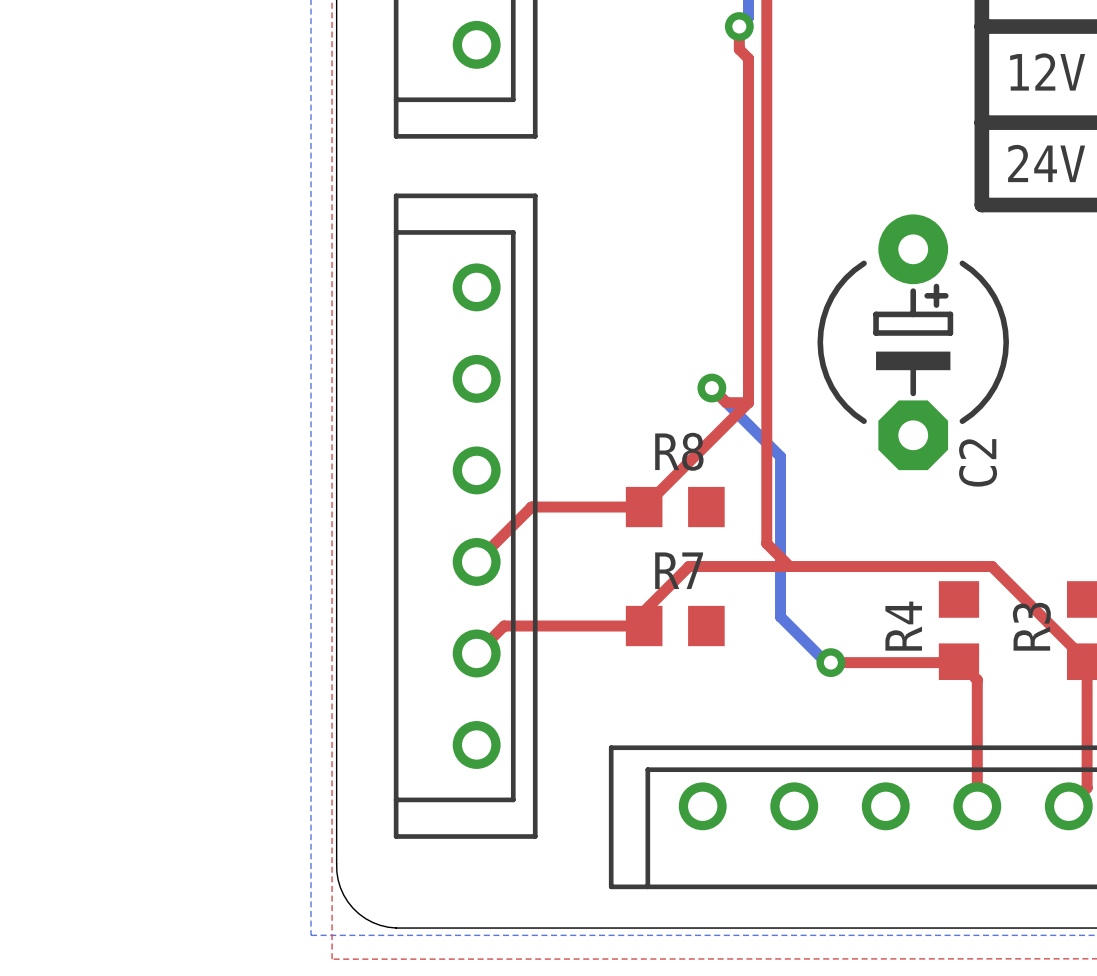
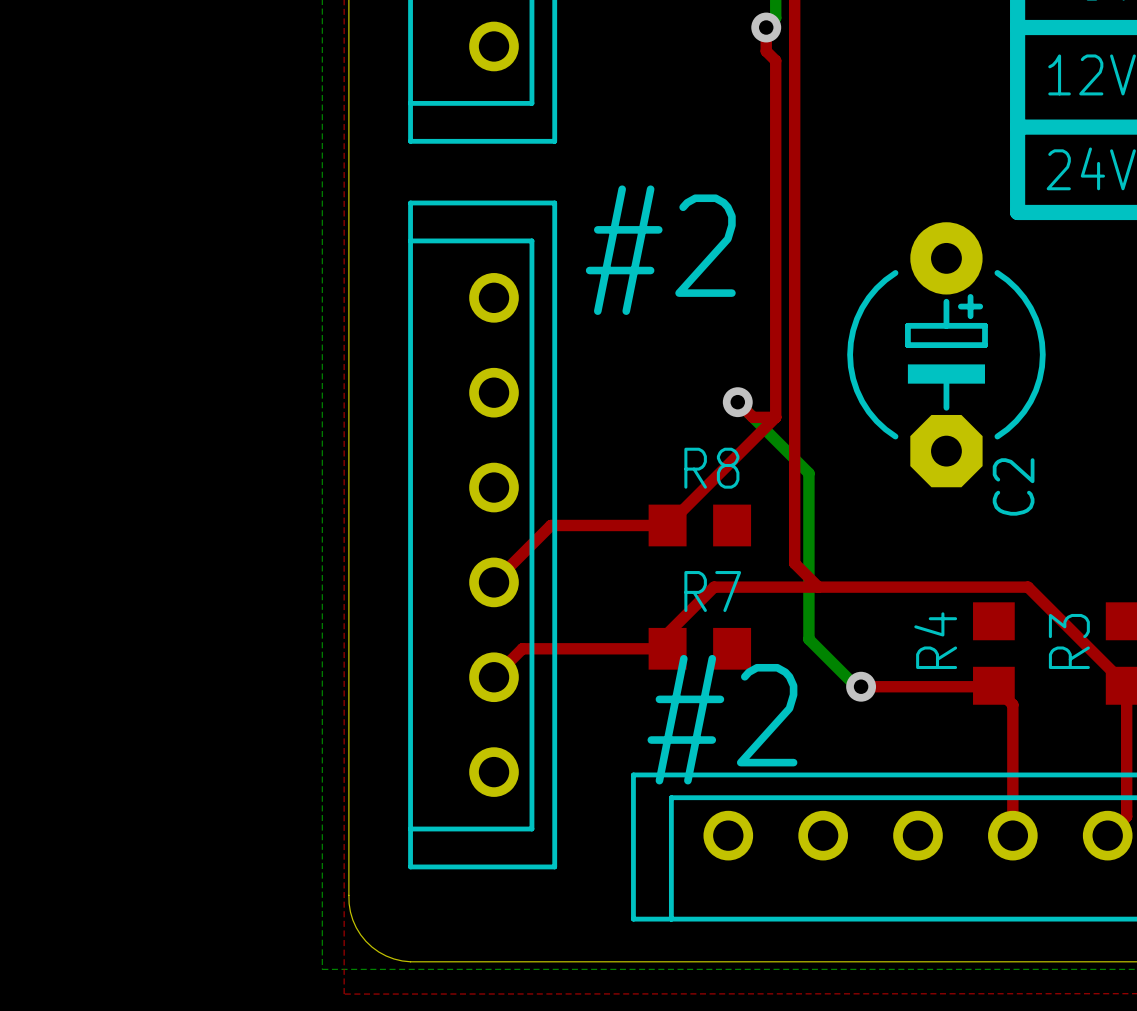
text: none -> #2 (660, 250)
text: none -> #2 (722, 719)

